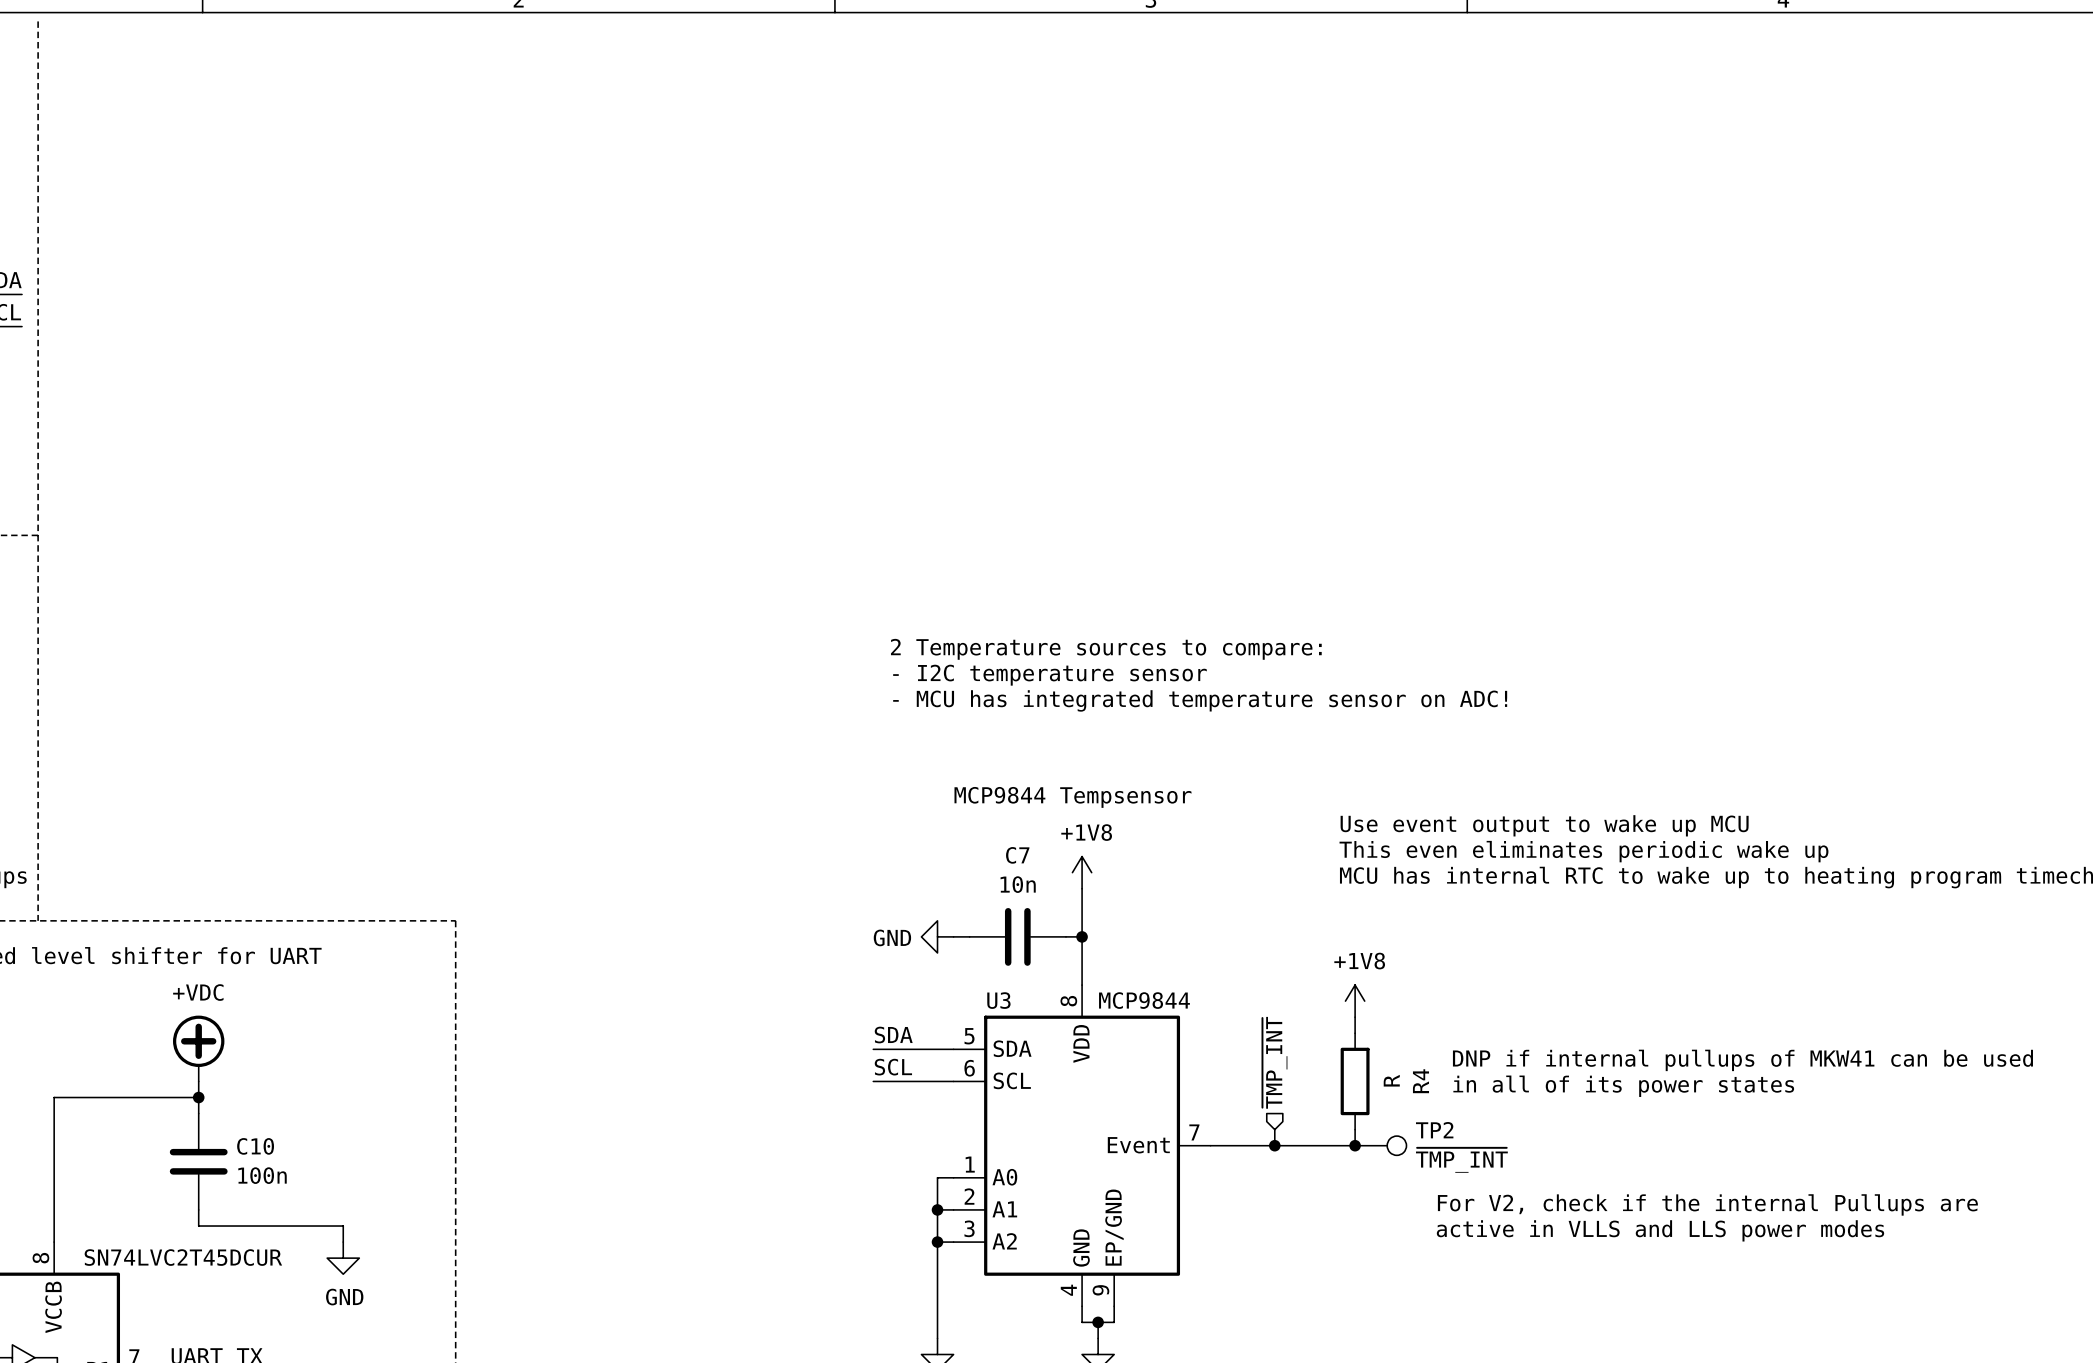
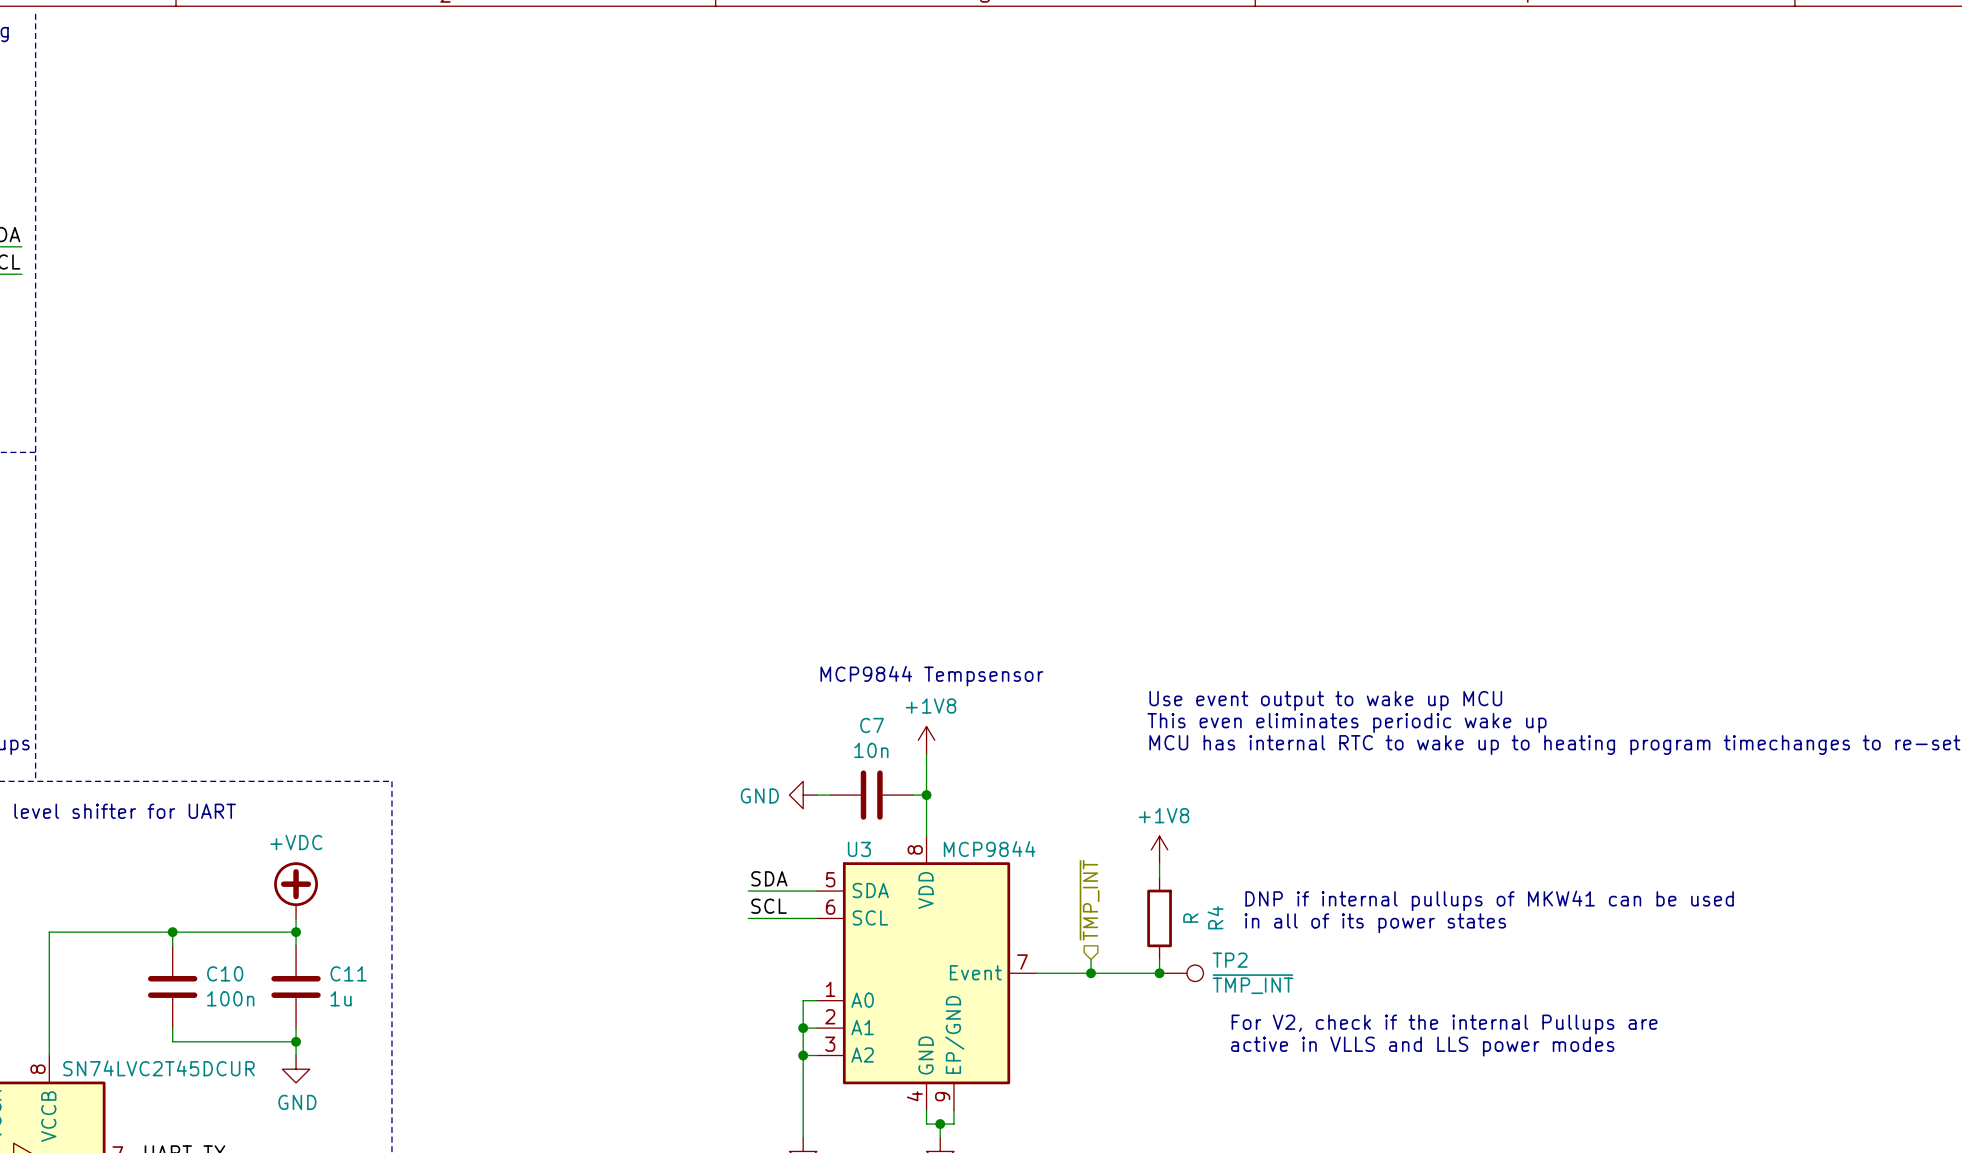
text: 2 Temperature sources to compare: (1106, 649) -> none
text: - I2C temperature sensor (1049, 675) -> none
text: - MCU has integrated temperature sensor on ADC! (1200, 700) -> none
power symbol position: +VDC (198, 1048) -> +VDC (296, 890)
wire: (198, 1081) (198, 1097) -> (296, 932) (172, 932)
wire: none -> (296, 918) (296, 945)
junction: none -> (296, 932)
C11: none -> 1u (296, 986)
wire: none -> (296, 1028) (296, 1041)
junction: none -> (296, 1041)

